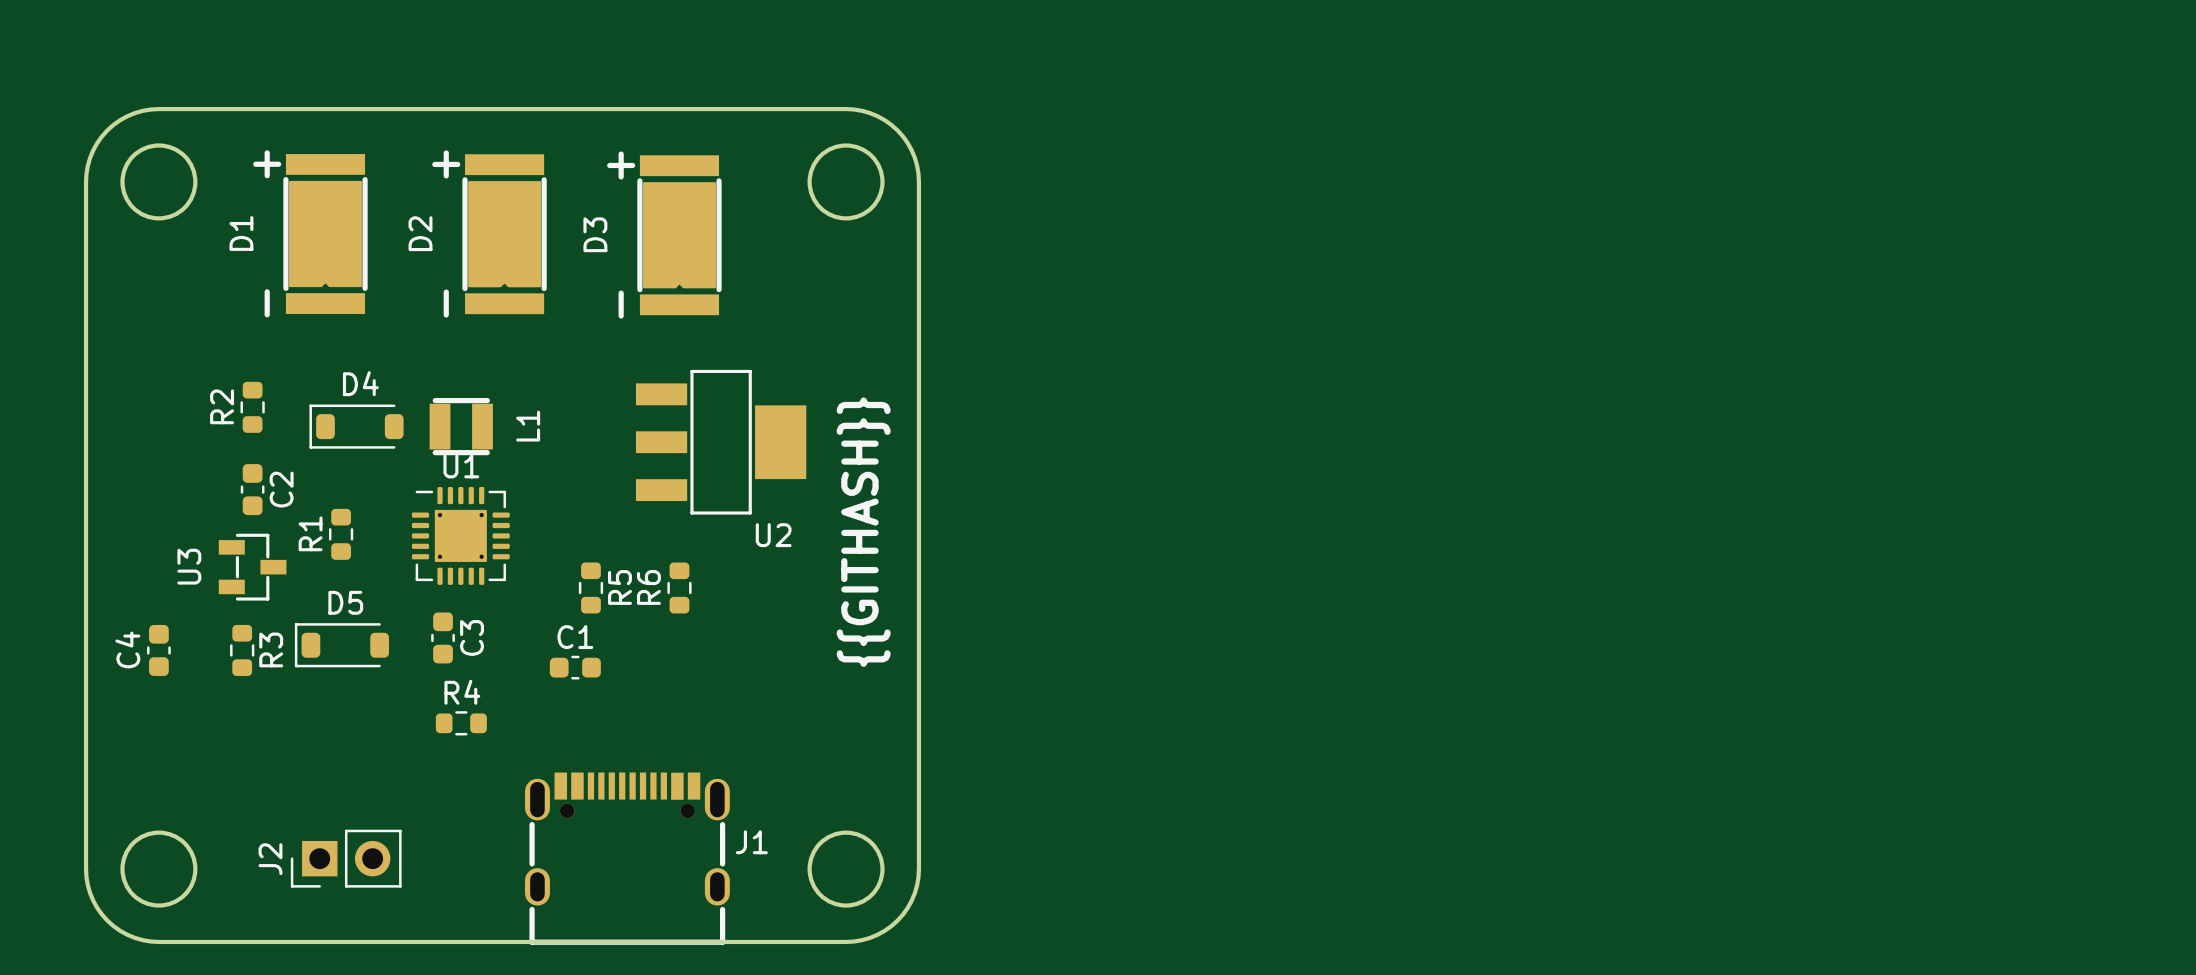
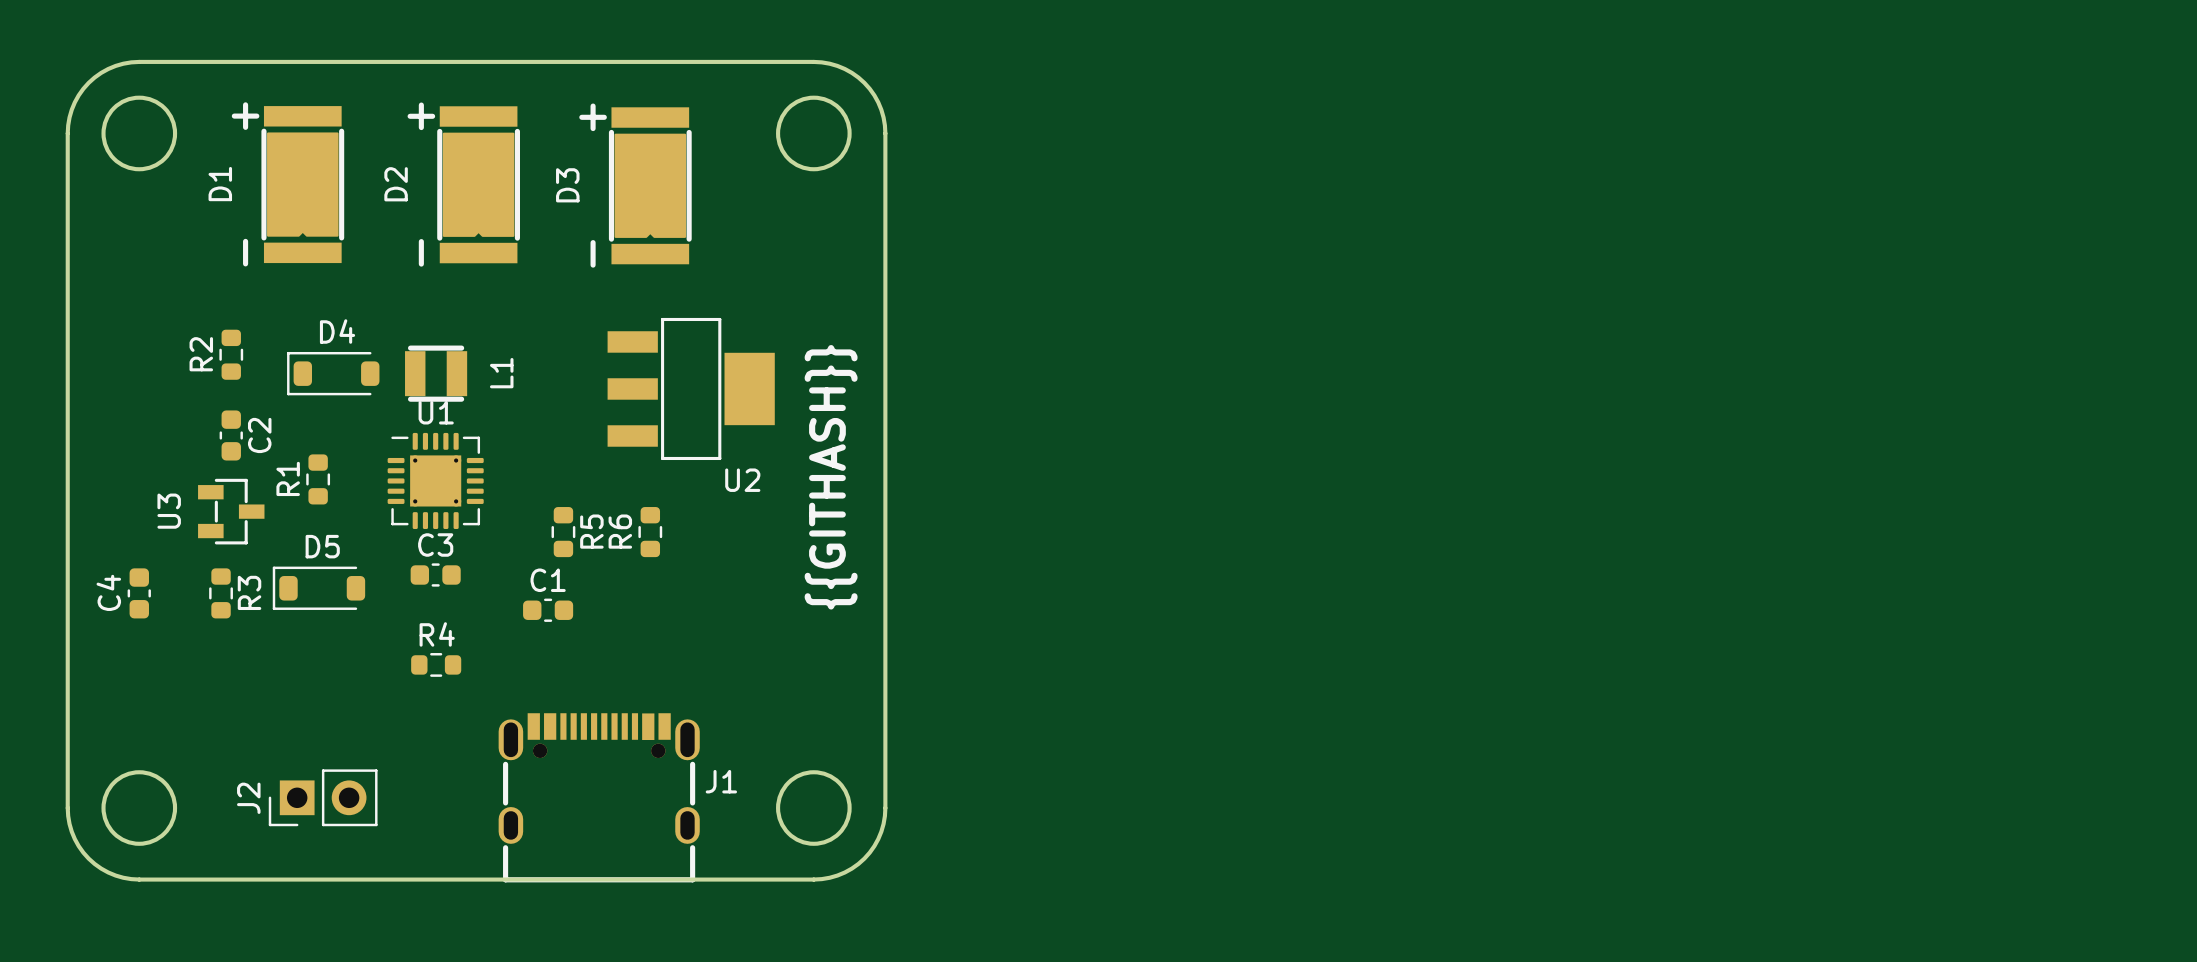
C3 rotation: 0° (443, 637) -> 90° clockwise (435, 574)
C3 name position: C3 (472, 637) -> C3 (435, 544)

